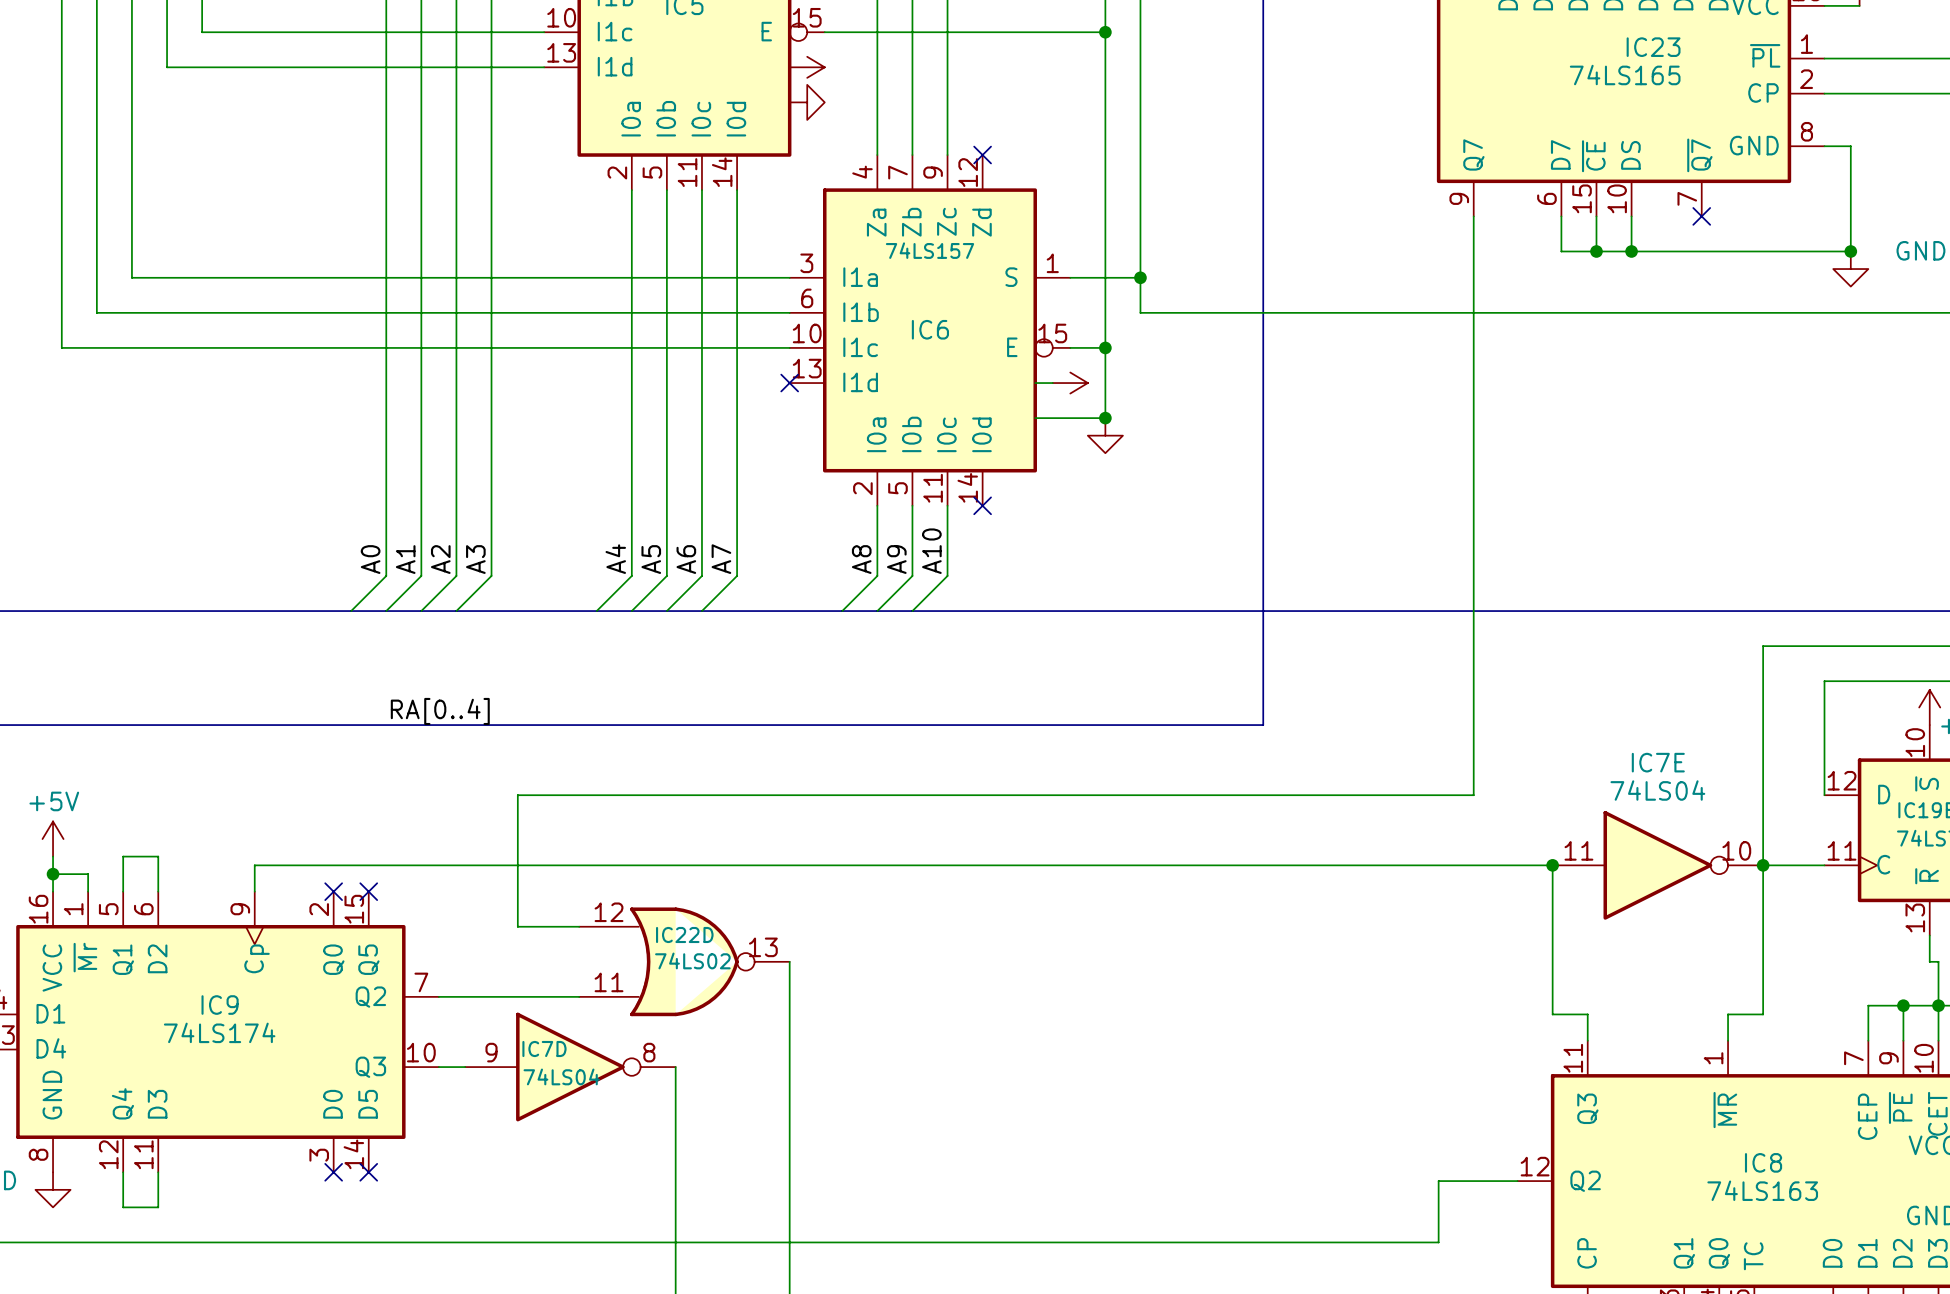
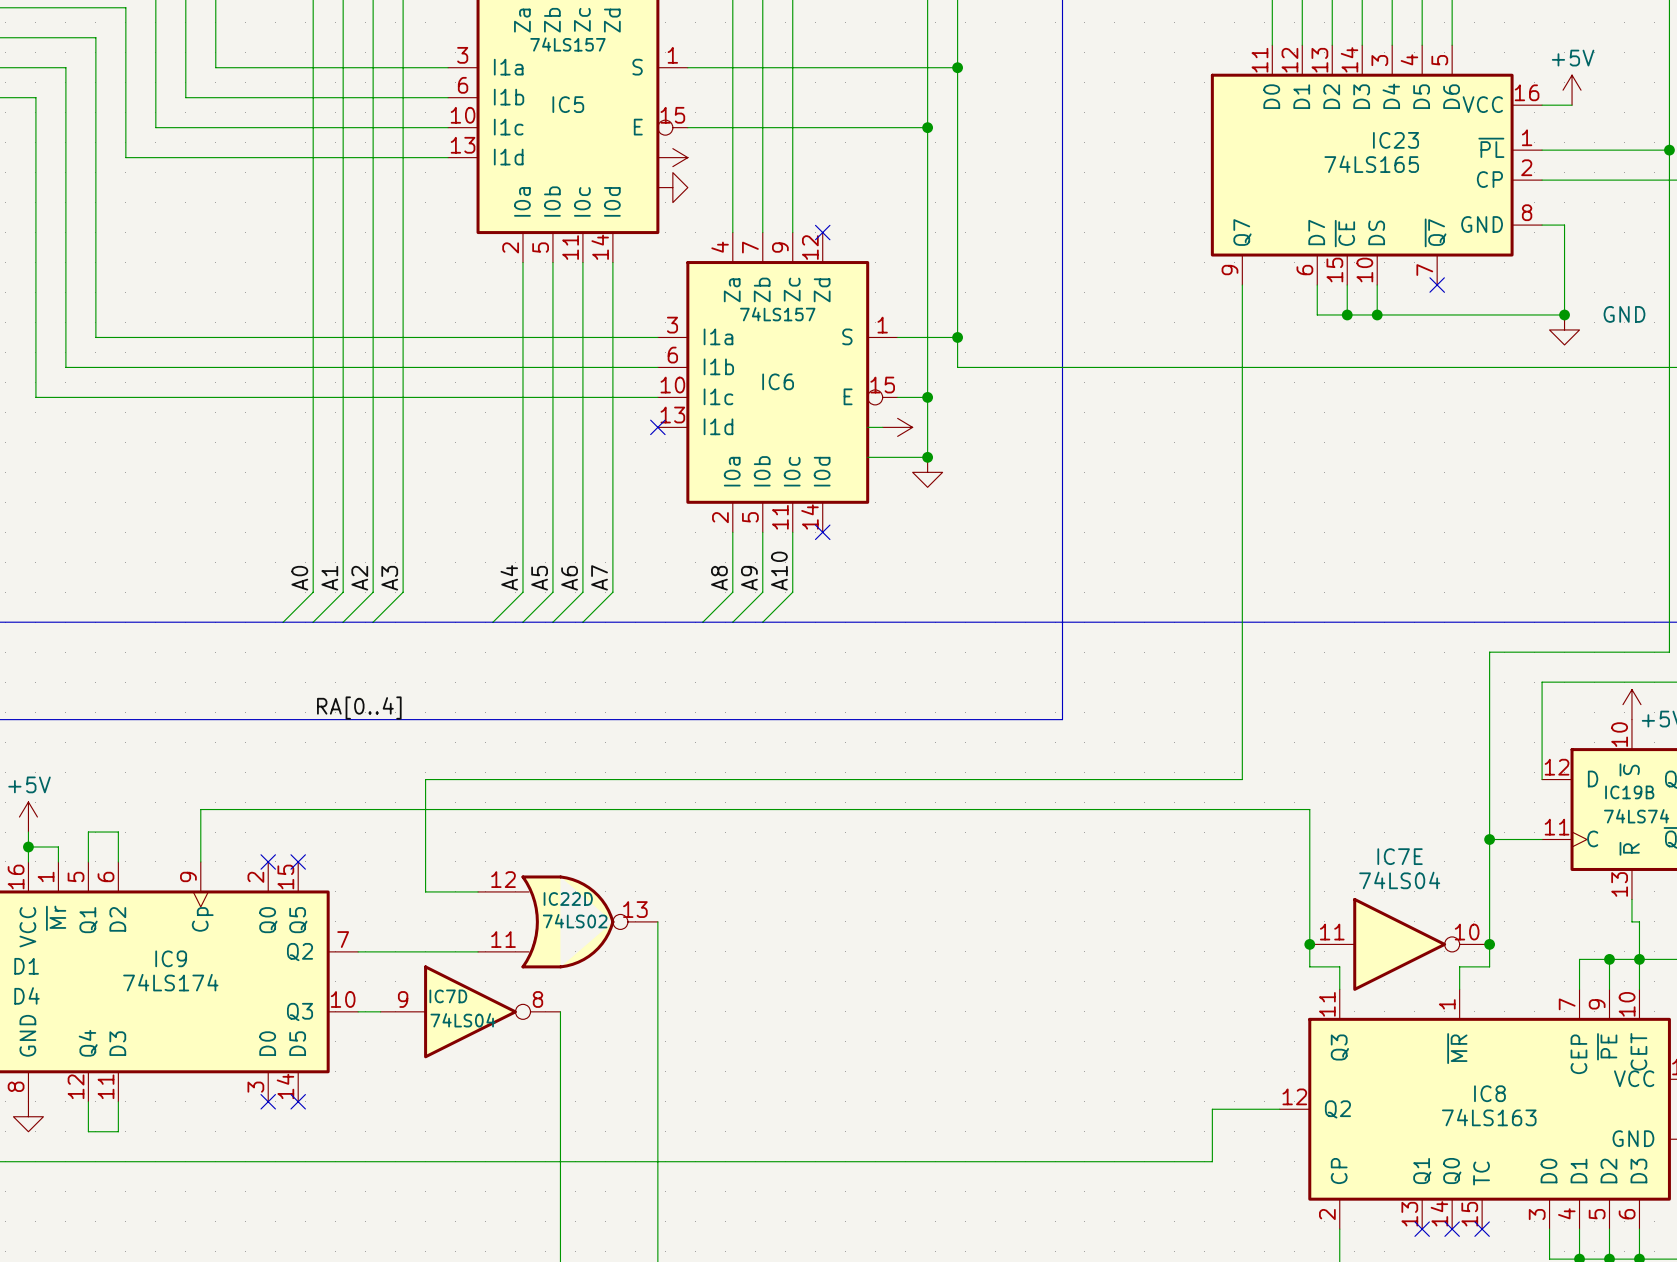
wire: (254, 865) (1552, 865) -> (200, 839) (200, 809) (1309, 809) (1309, 839)
junction: (1552, 865) -> none
IC7E position: (1657, 865) -> (1399, 944)
junction: none -> (1309, 944)
junction: none -> (1489, 944)

